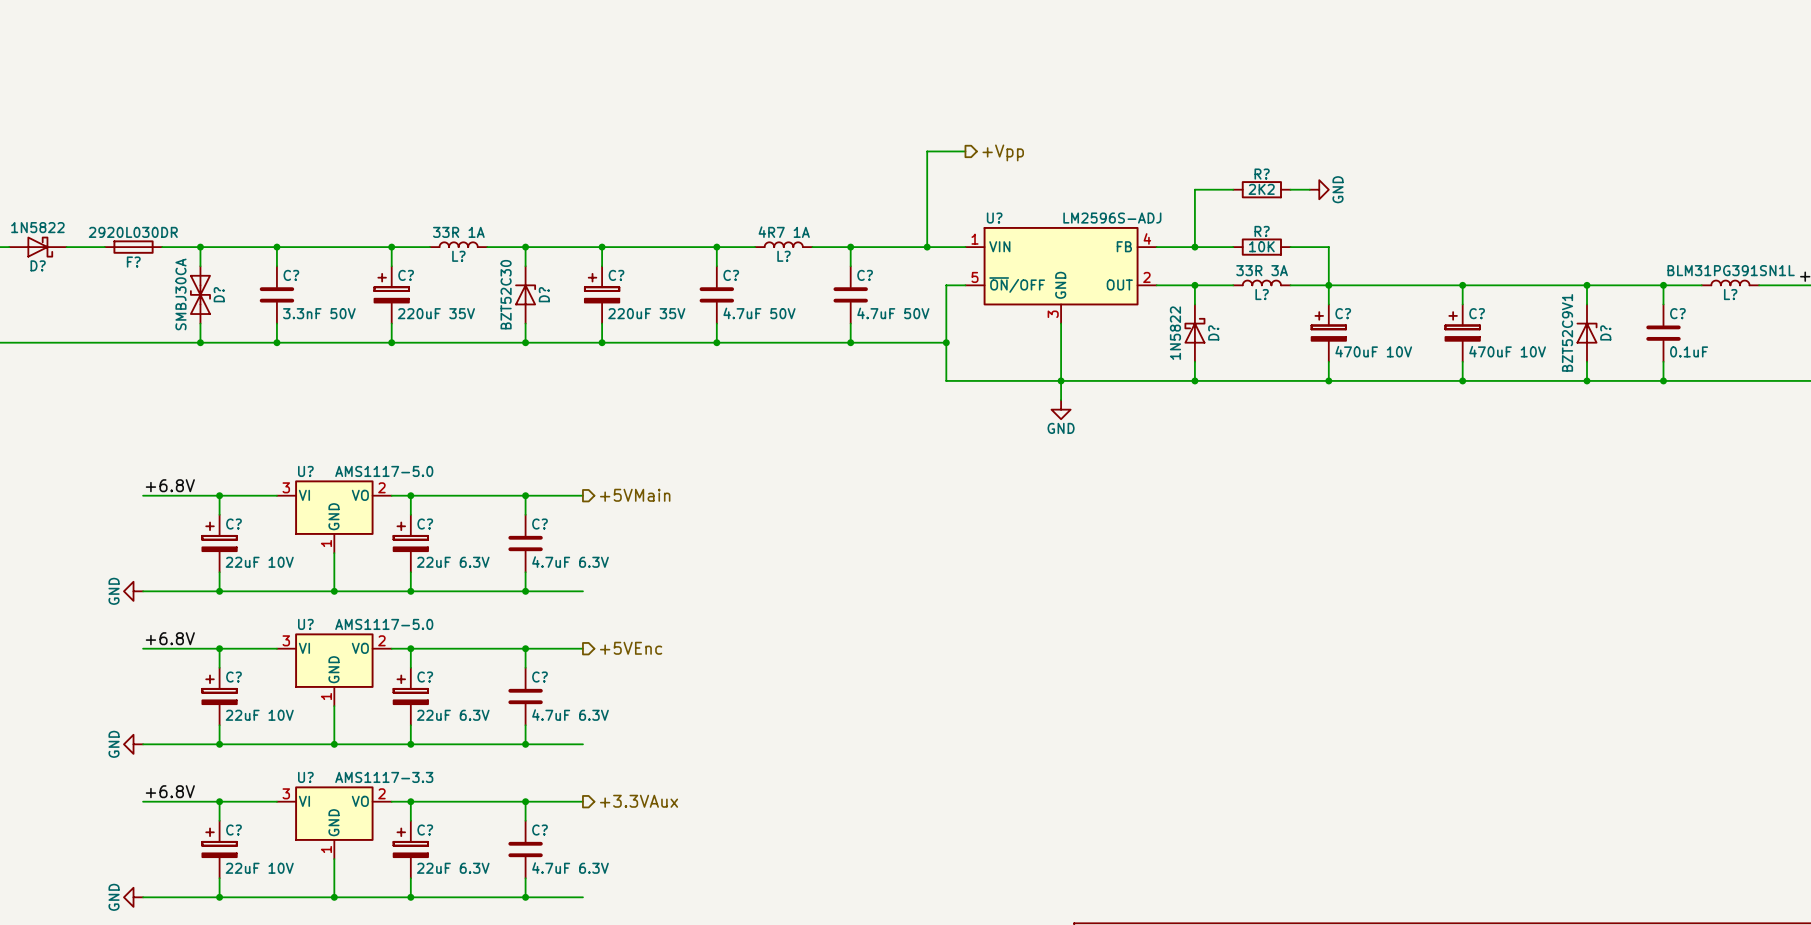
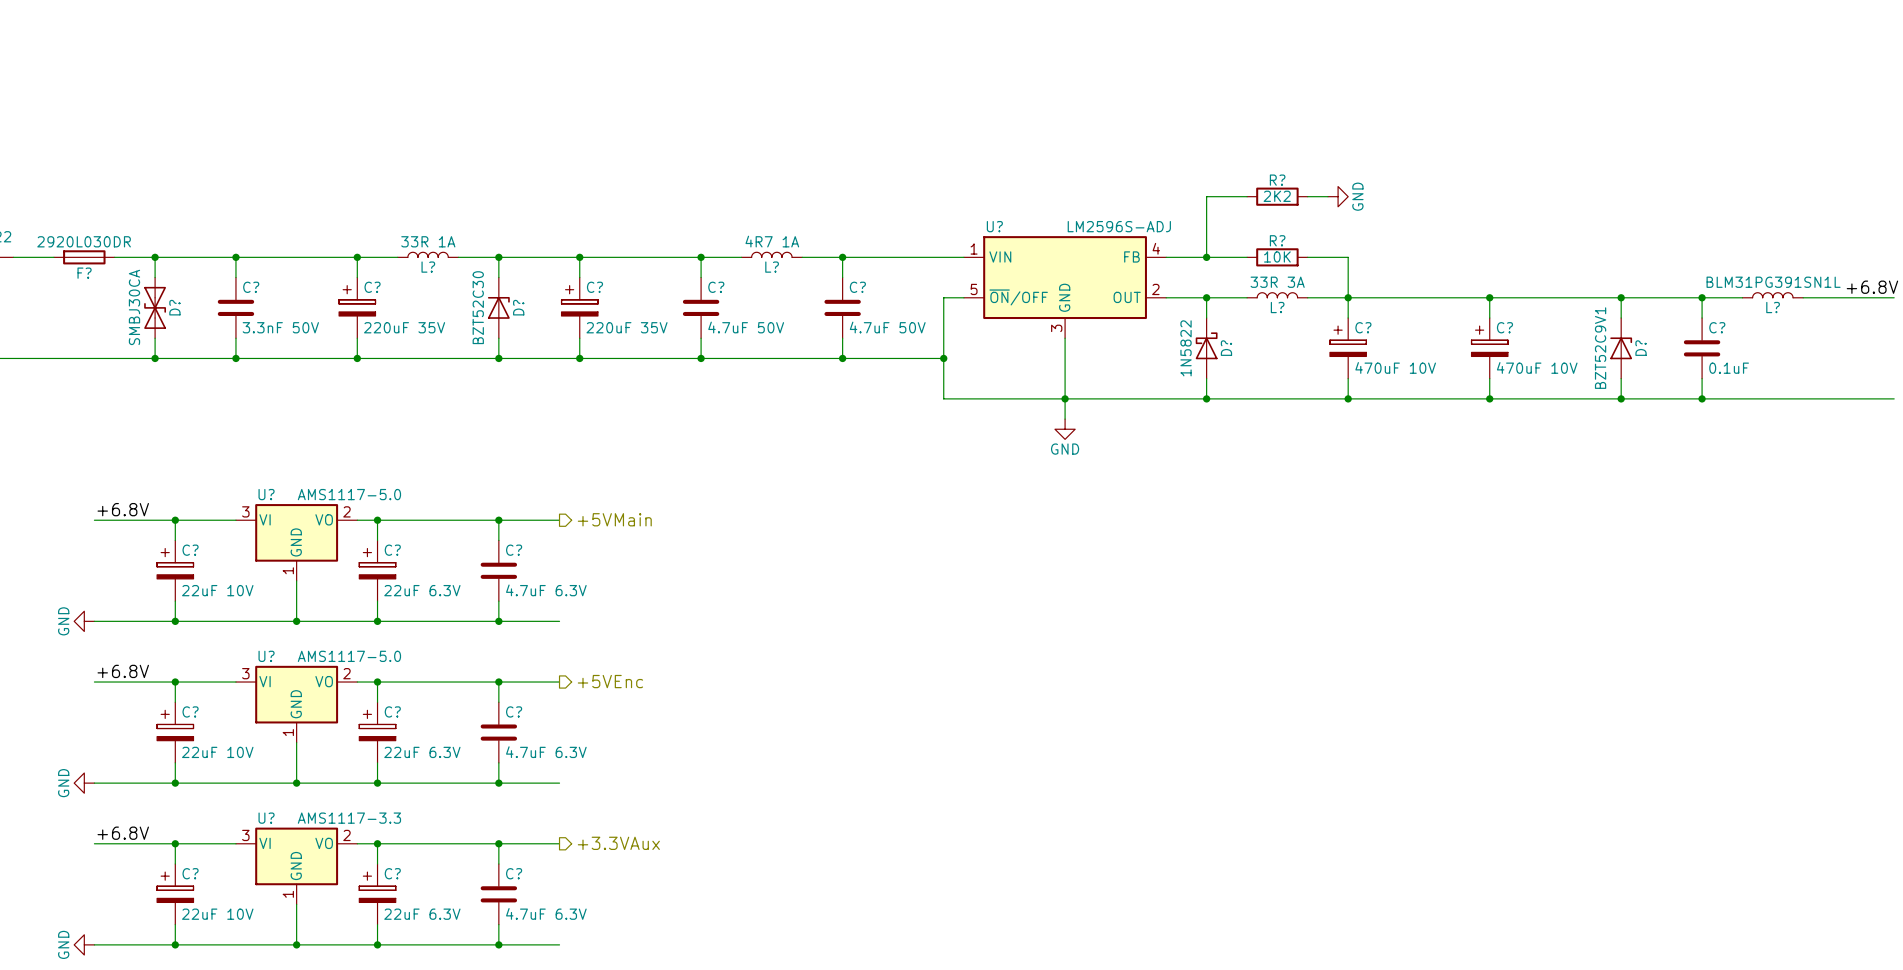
wire: (965, 151) (927, 151) (927, 247) -> none
hierarchical label: +Vpp (1003, 152) -> none
junction: (927, 247) -> none

